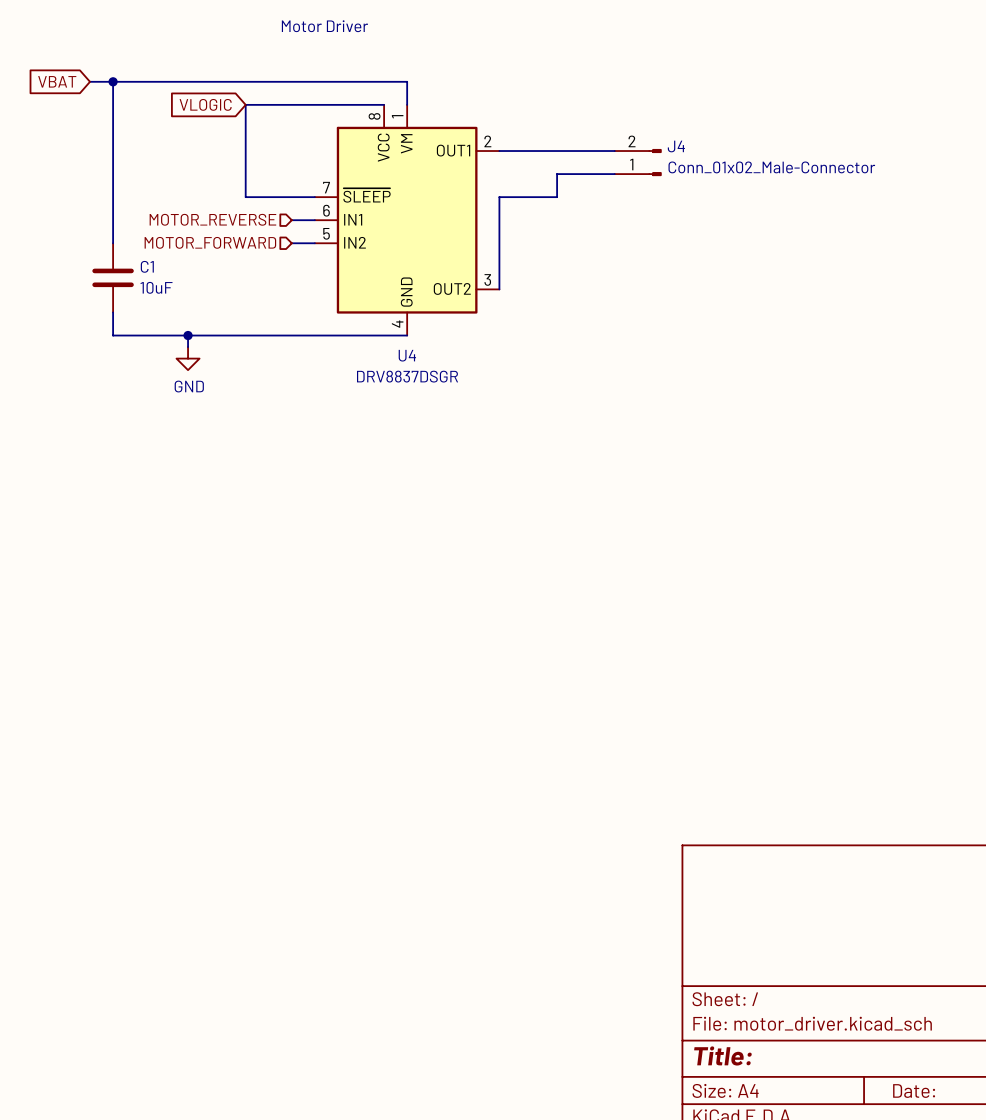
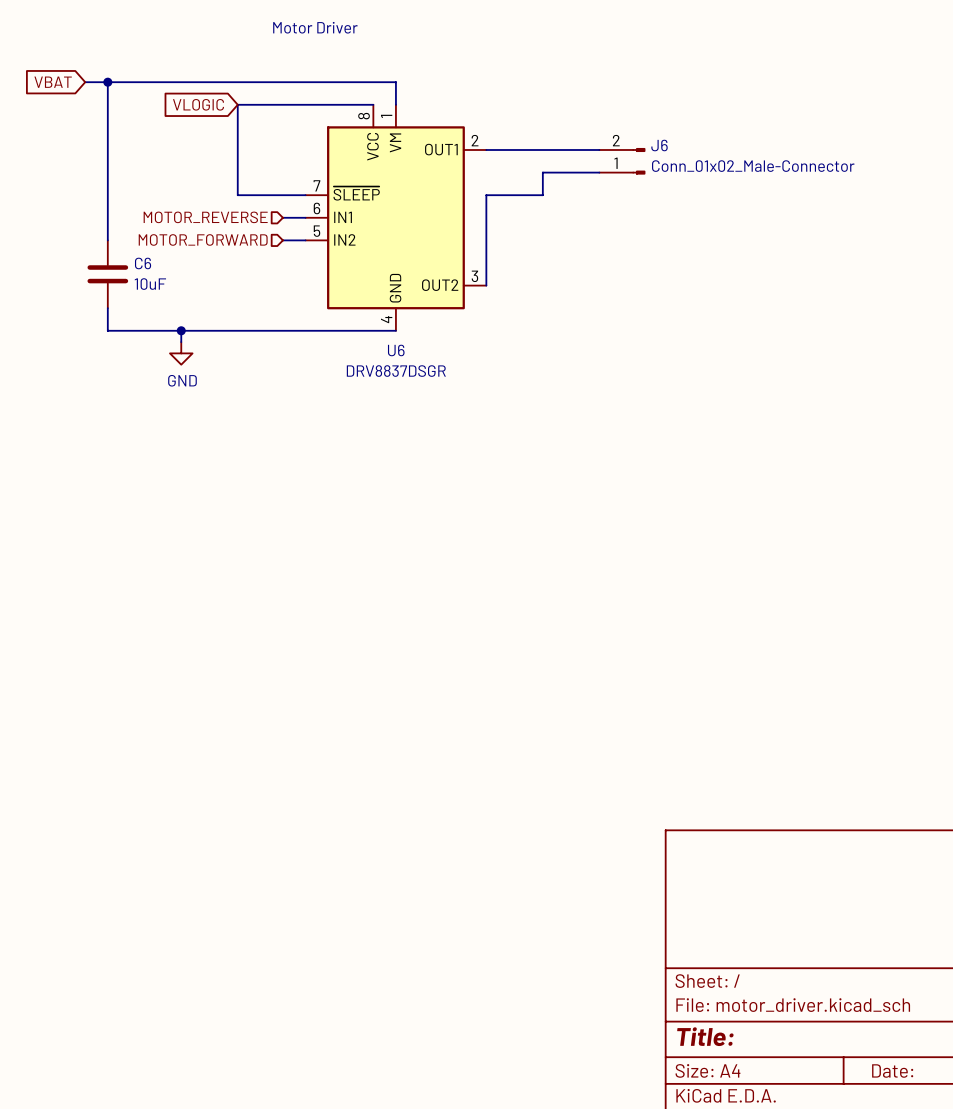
J4 name: J4 (676, 146) -> J6 (659, 145)
C1 name: C1 (147, 266) -> C6 (143, 263)
U4 name: U4 (407, 355) -> U6 (396, 350)

